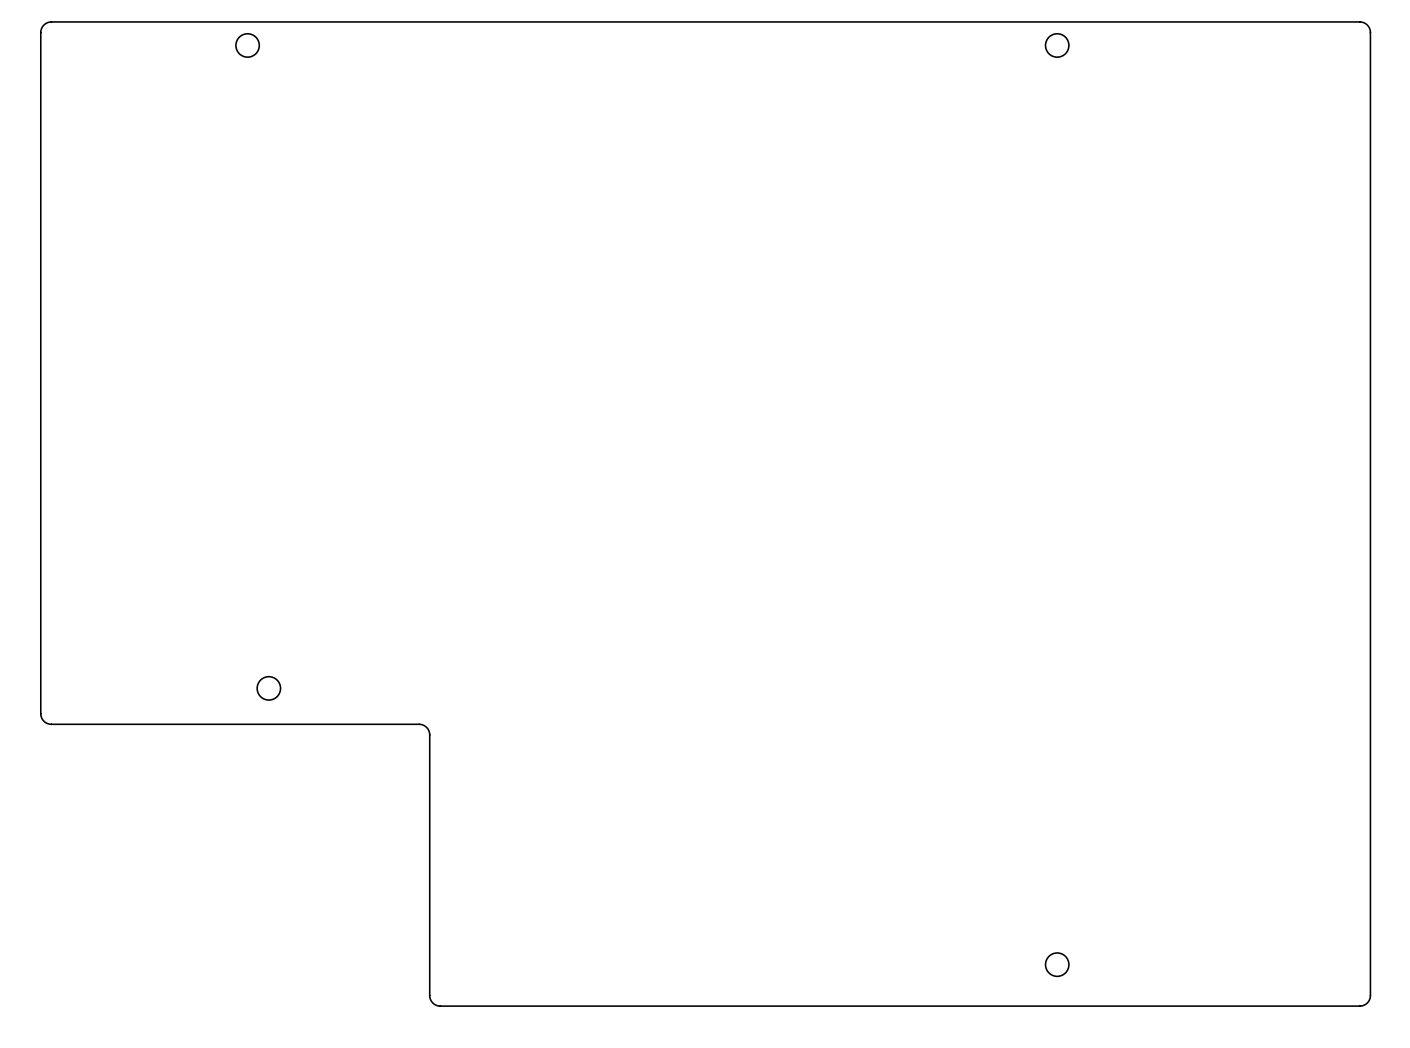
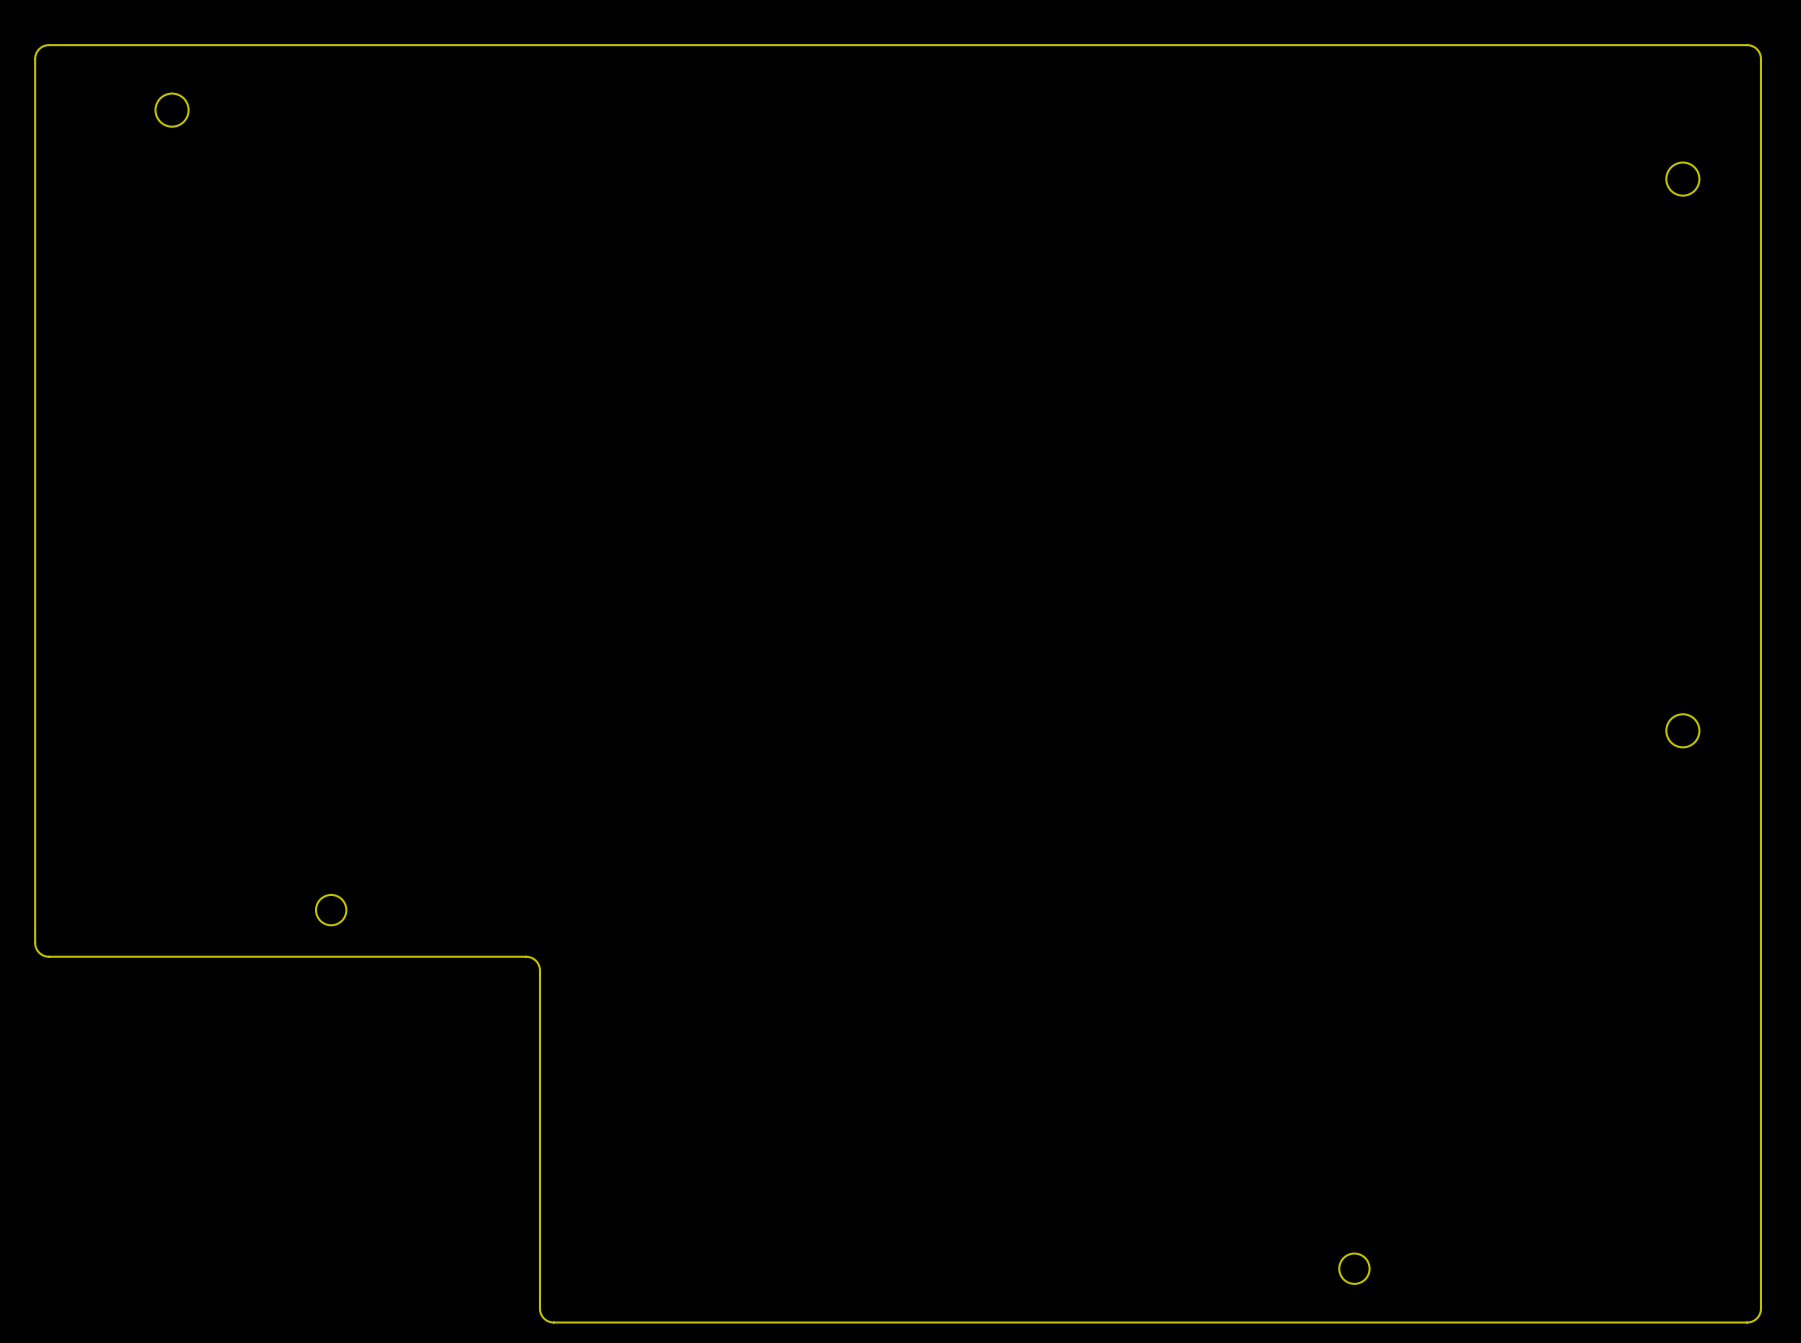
round board edge: [235, 32, 261, 58] -> none
round board edge: [1044, 32, 1070, 58] -> none
round board edge: none -> [154, 92, 190, 128]
round board edge: none -> [1665, 161, 1701, 197]
round board edge: none -> [1665, 713, 1701, 749]

